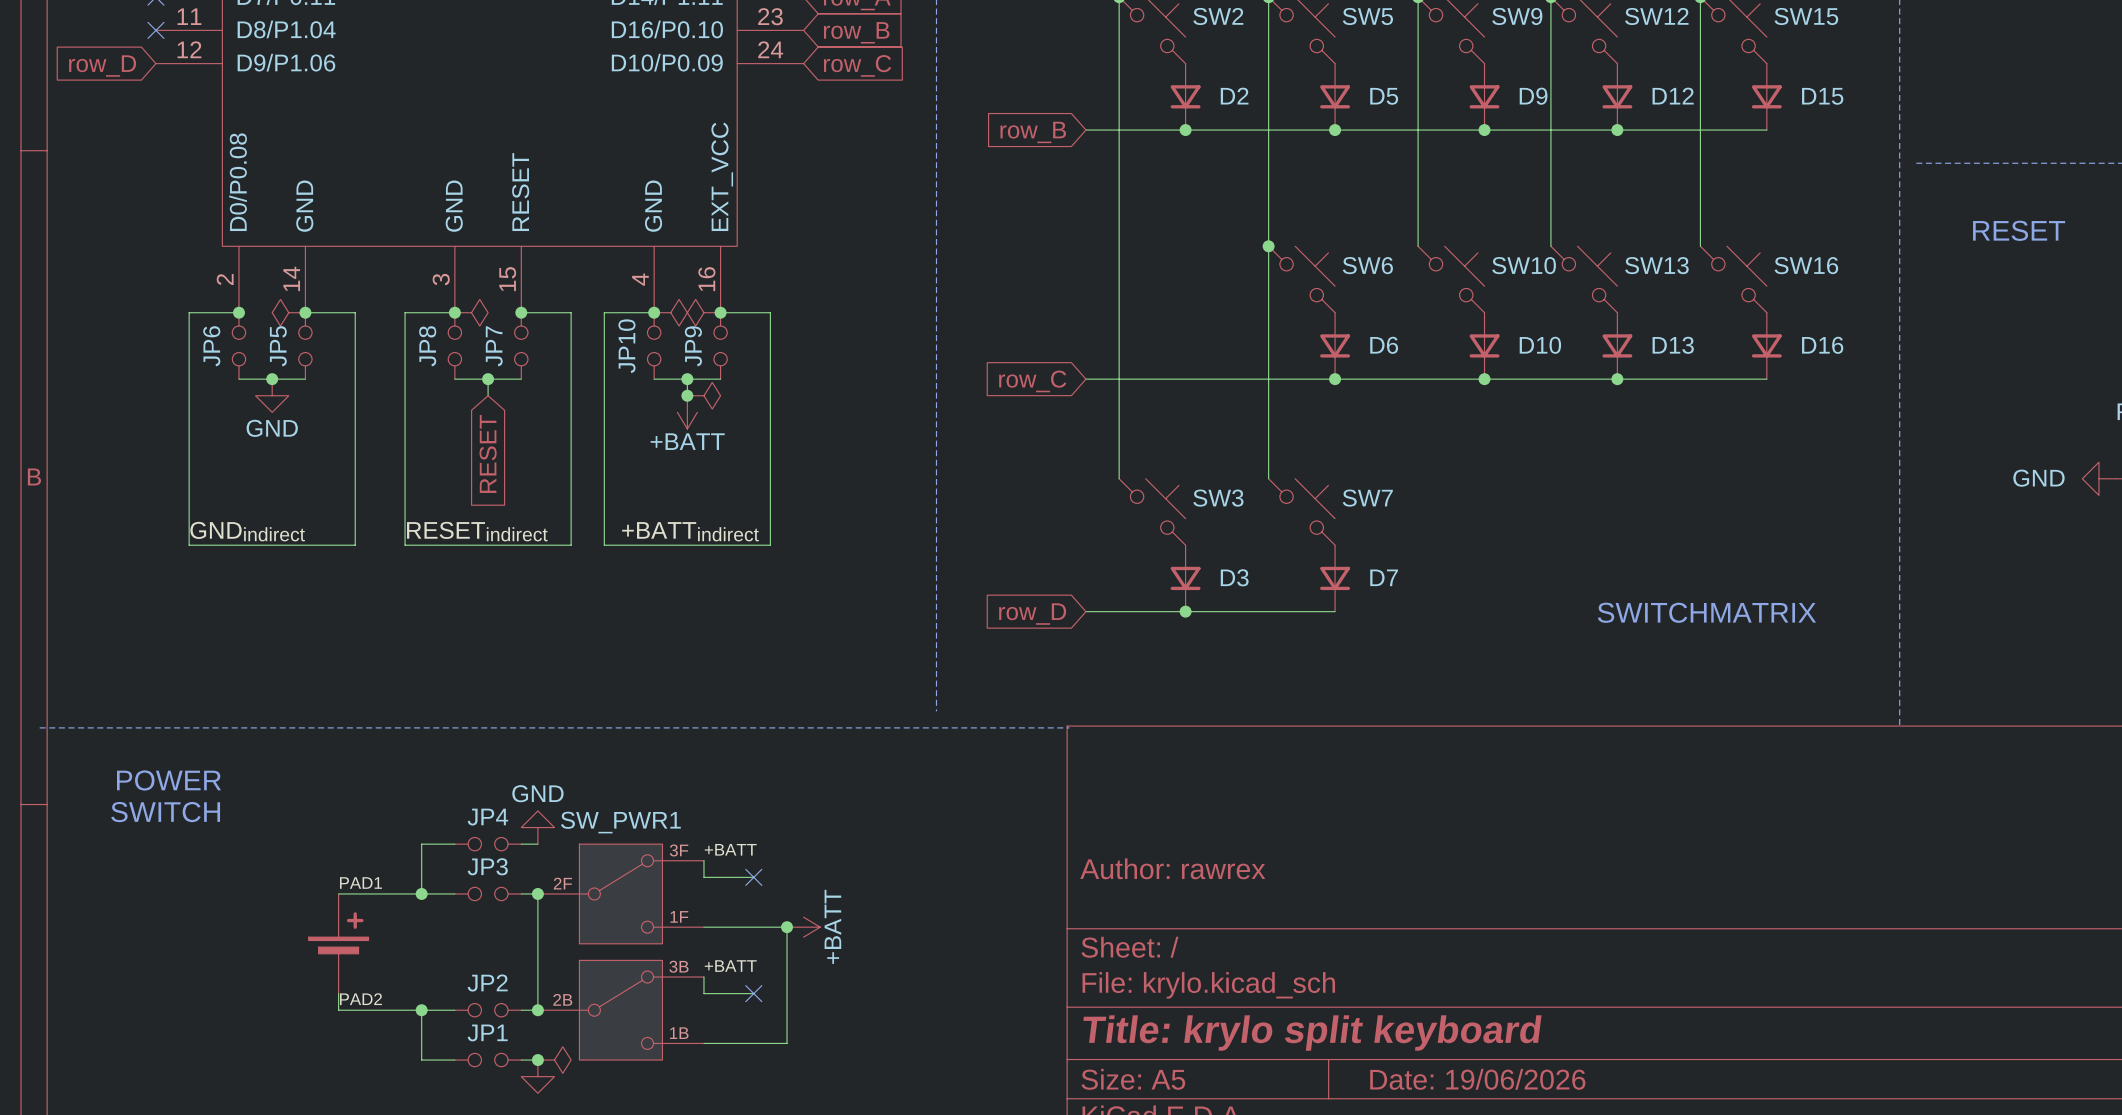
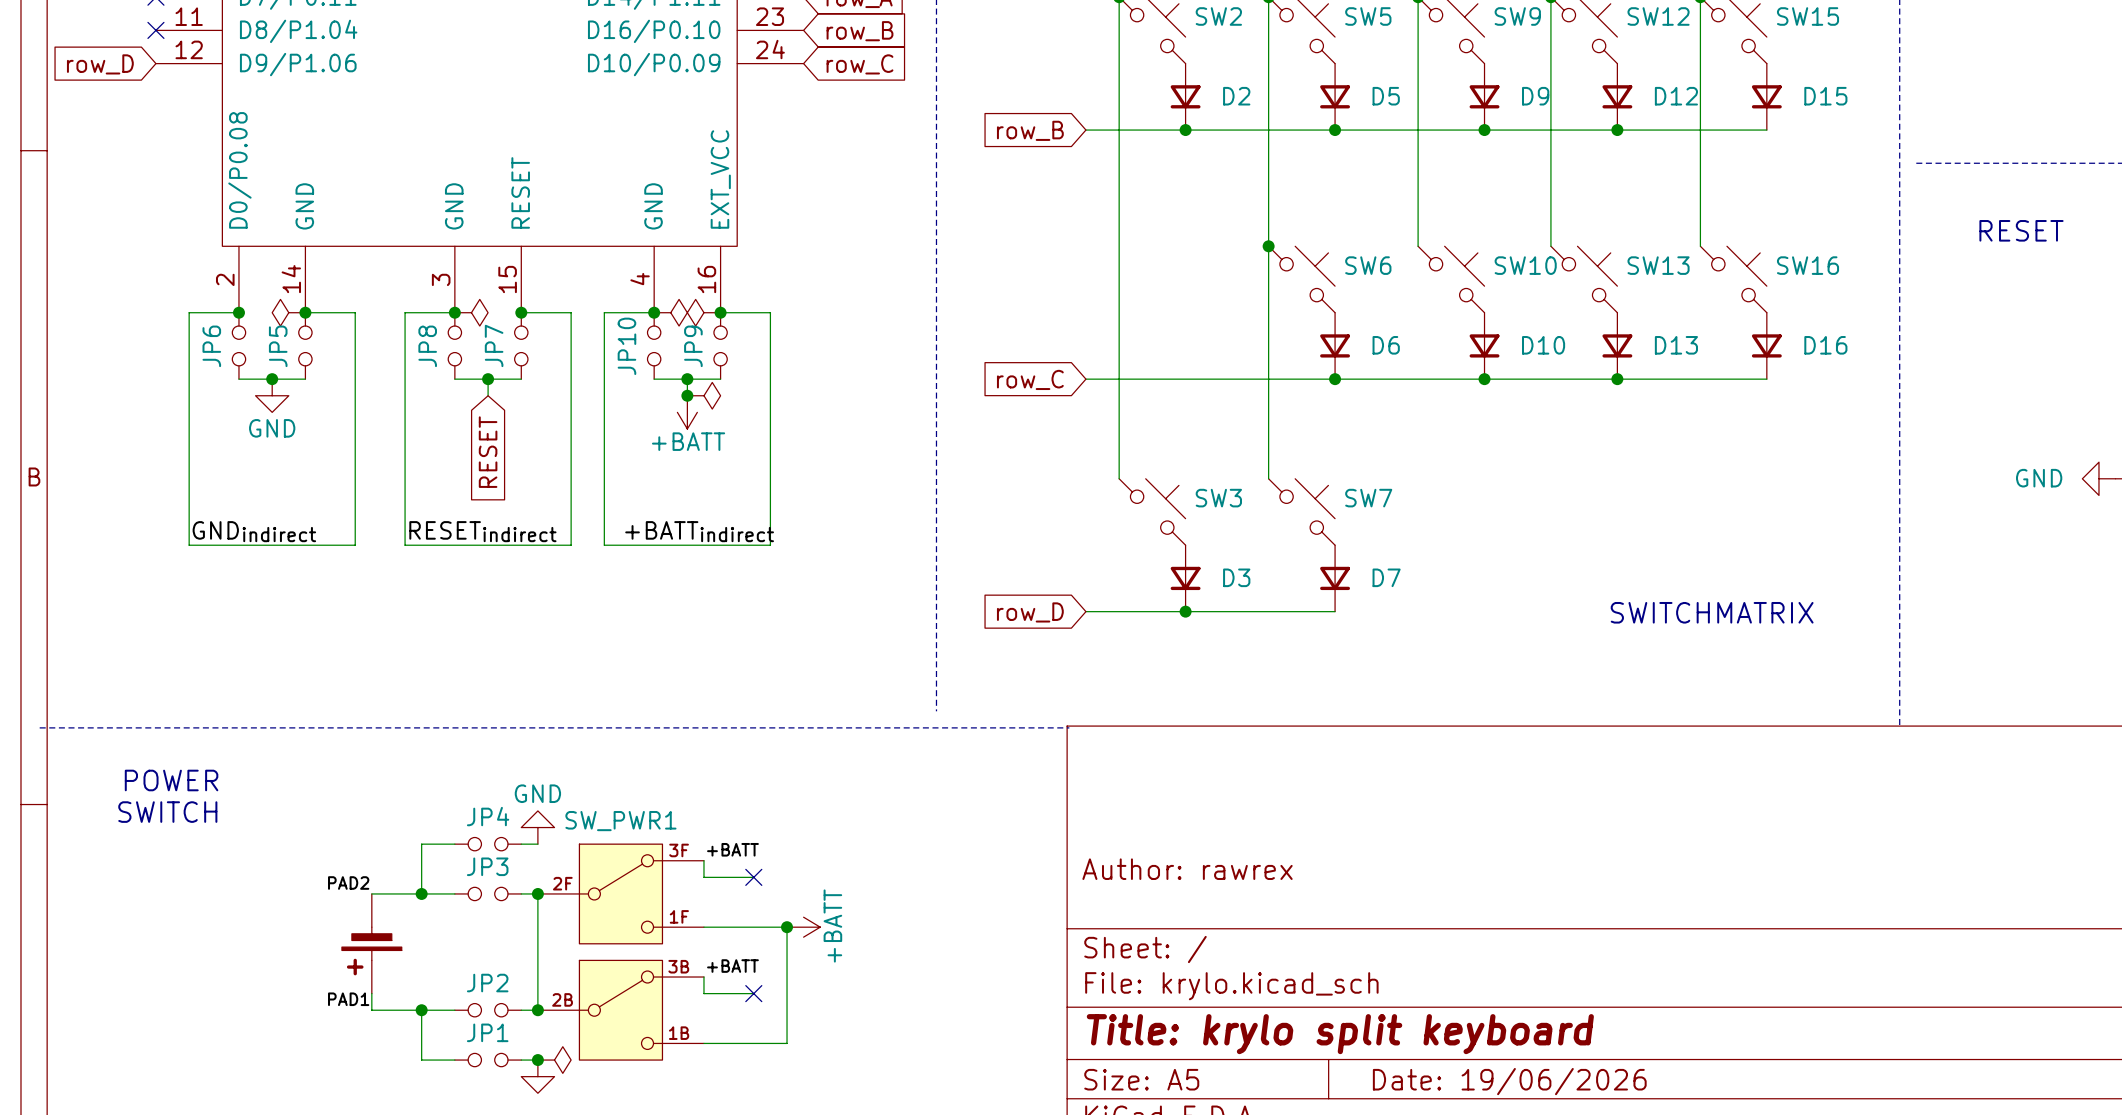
label position: PAD1 (360, 883) -> PAD1 (348, 999)
wire: (338, 893) (371, 893) -> none
part rotation: 0° (338, 936) -> 180° (371, 951)
wire: (338, 993) (338, 1010) (371, 1010) -> (371, 993) (371, 1010)
label position: PAD2 (360, 999) -> PAD2 (348, 883)

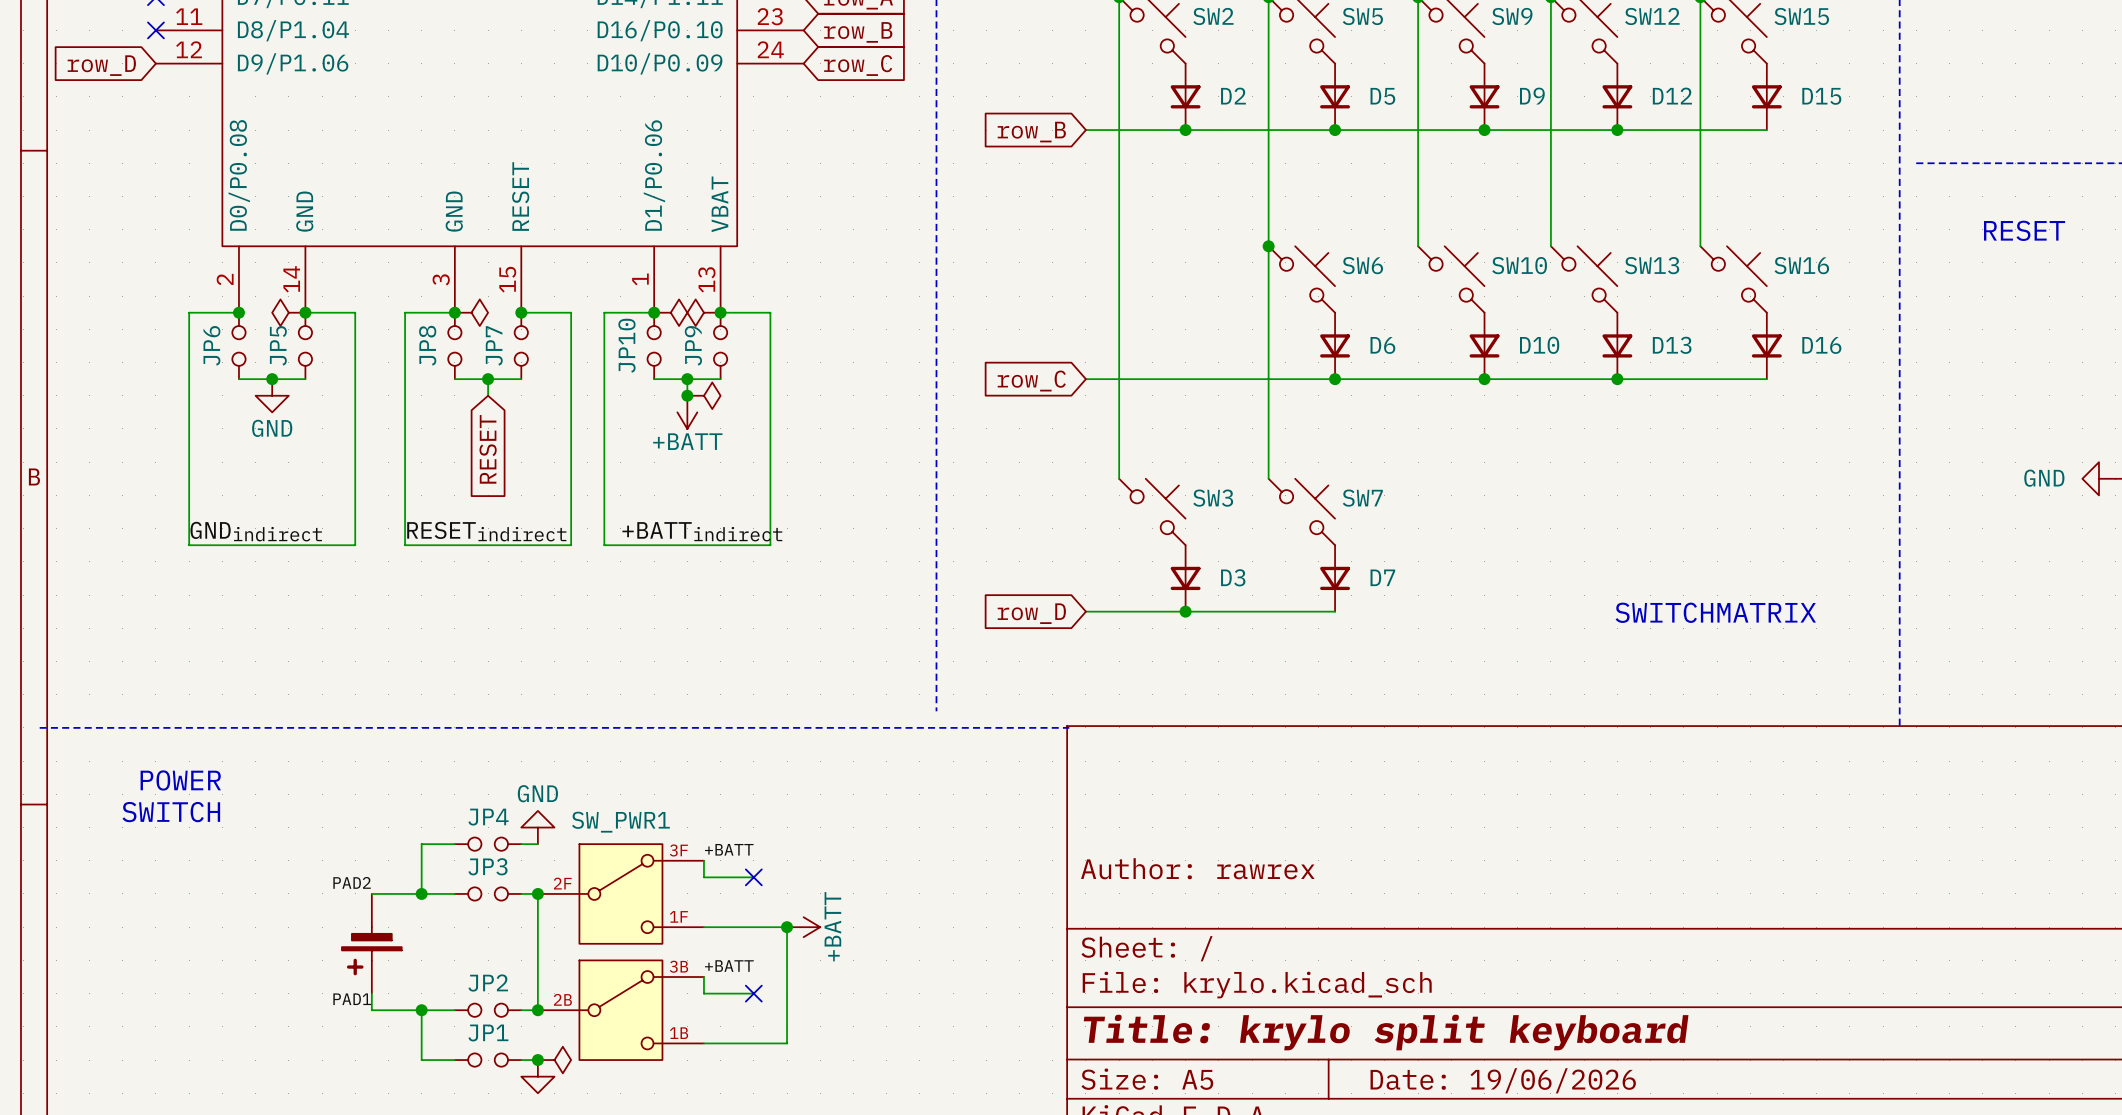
part pin name: EXT_VCC (720, 179) -> VBAT (719, 204)
part pin name: GND (653, 206) -> D1/P0.06 (654, 175)
part pin number: 4 (640, 279) -> 1 (640, 279)
part pin number: 16 (706, 279) -> 13 (706, 279)

